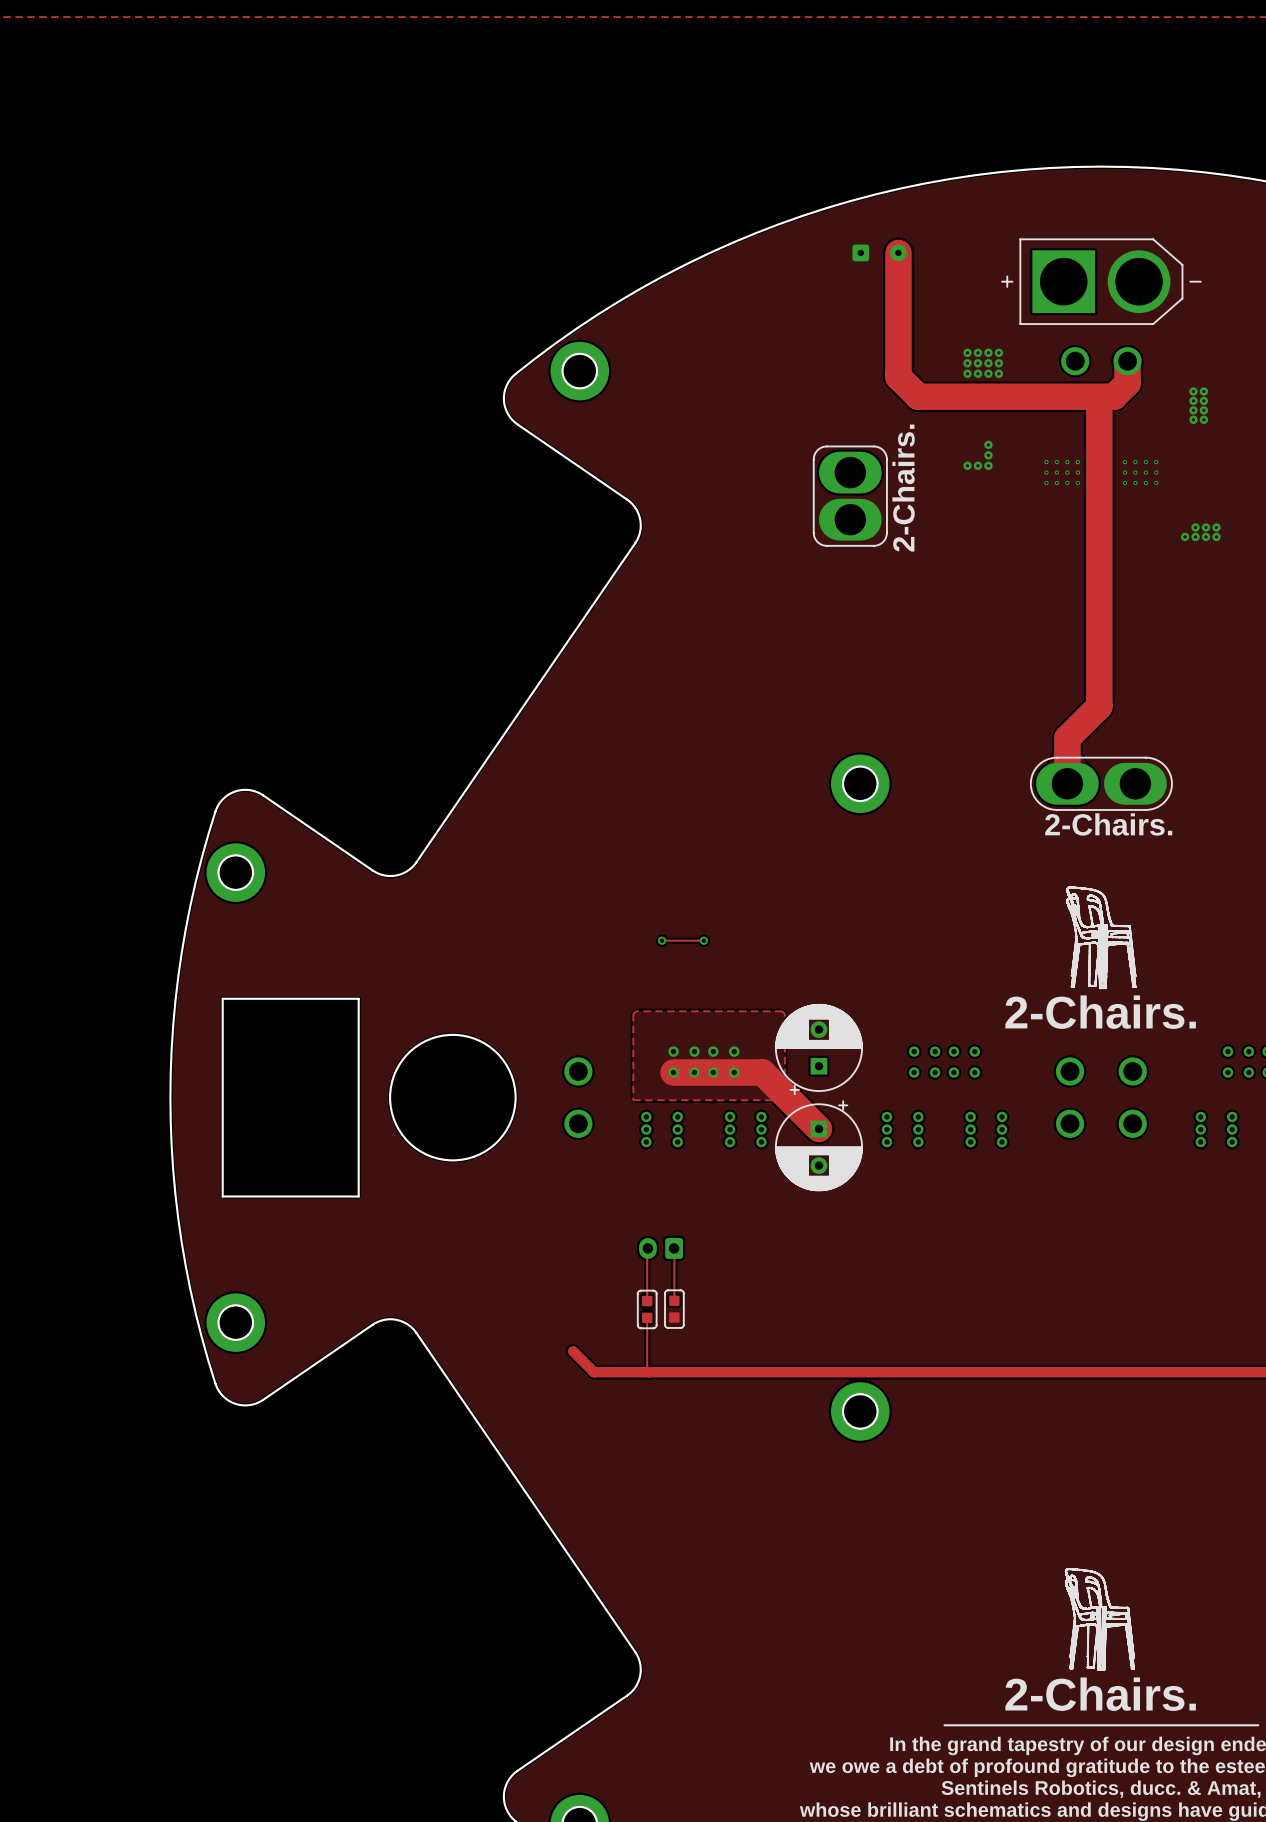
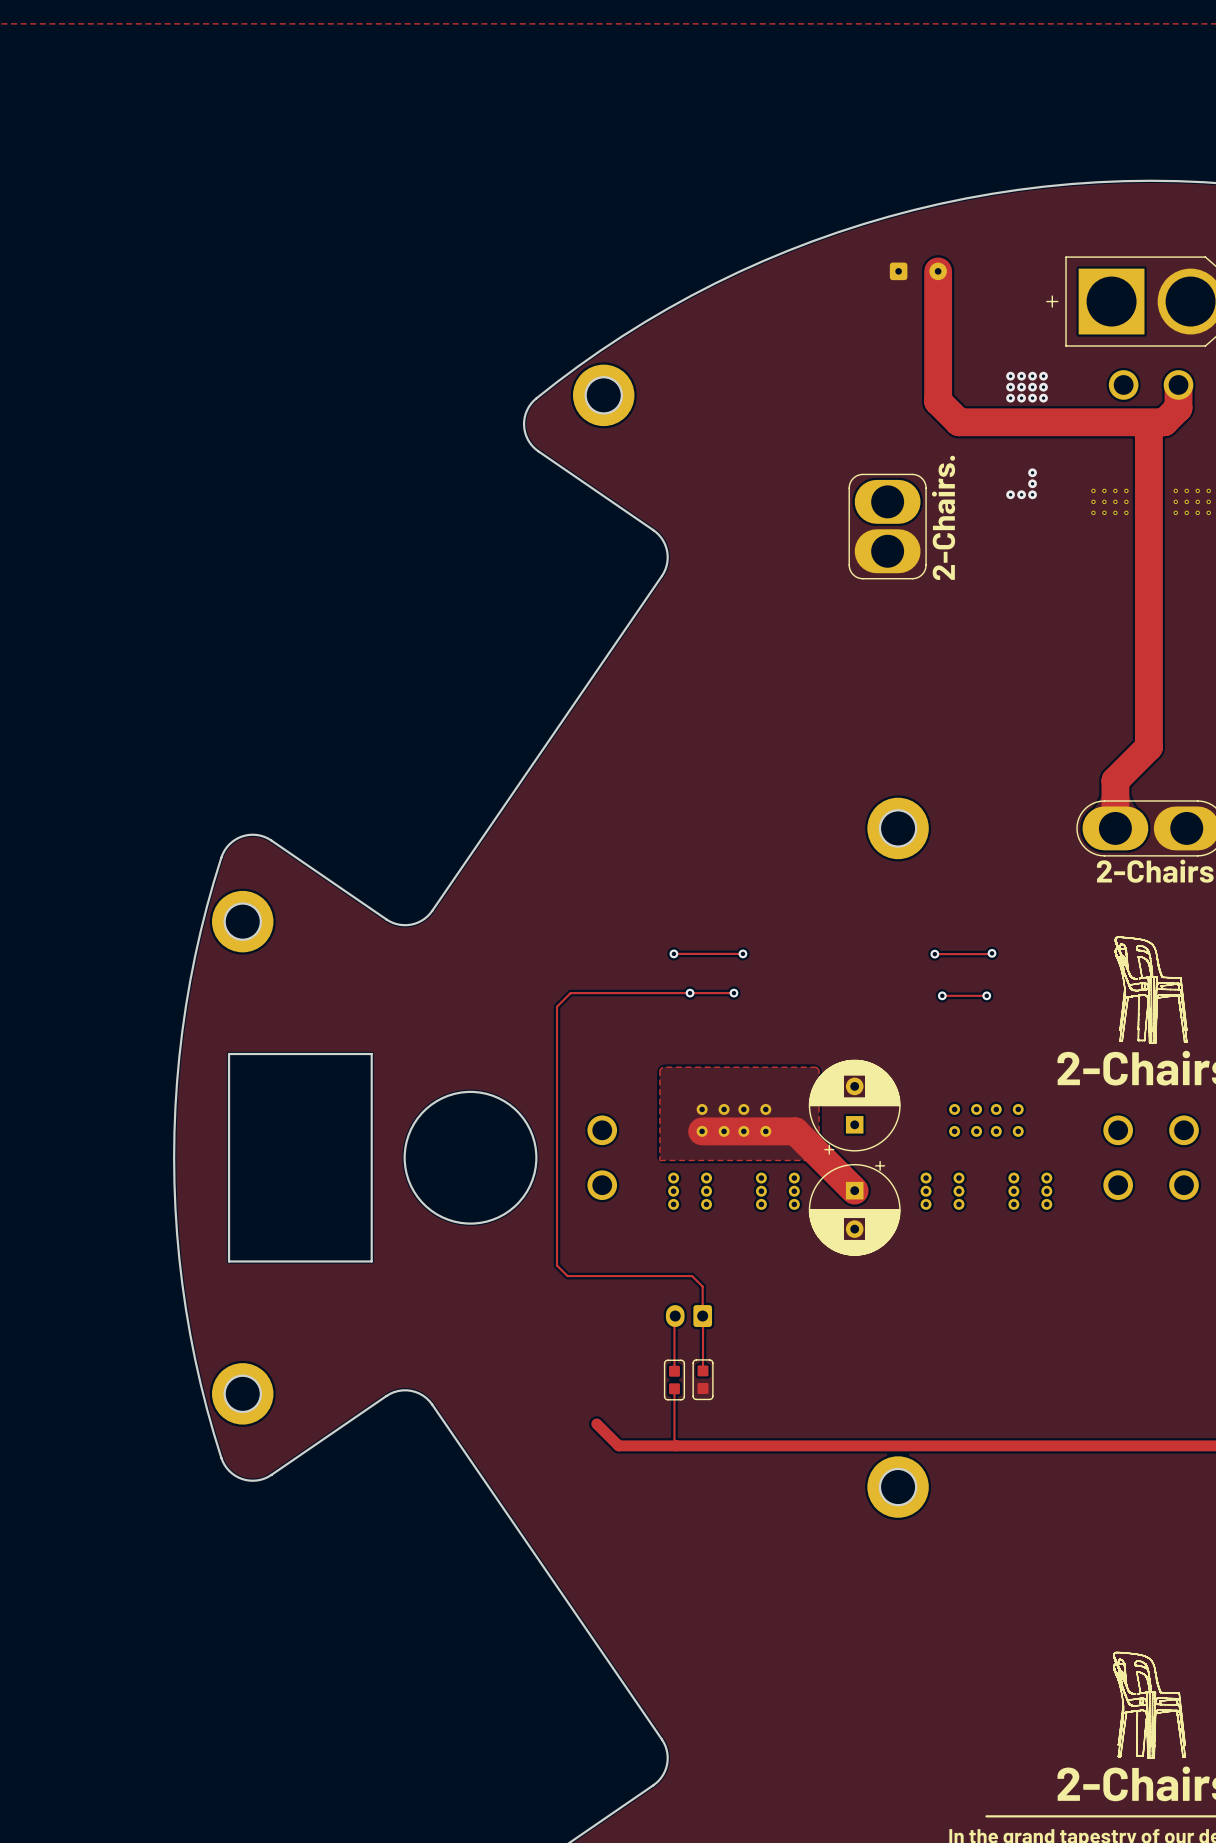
track: none -> (992, 953) (934, 954)
via: none -> (992, 953)
track: none -> (673, 953) (742, 953)
via: none -> (673, 953)
via: none -> (742, 953)
via: none -> (934, 954)
track: none -> (690, 993) (570, 993) (557, 1006) (557, 1265) (567, 1276) (692, 1276) (702, 1286) (702, 1316)
track: none -> (942, 995) (986, 995)
via: none -> (942, 995)
via: none -> (986, 995)

